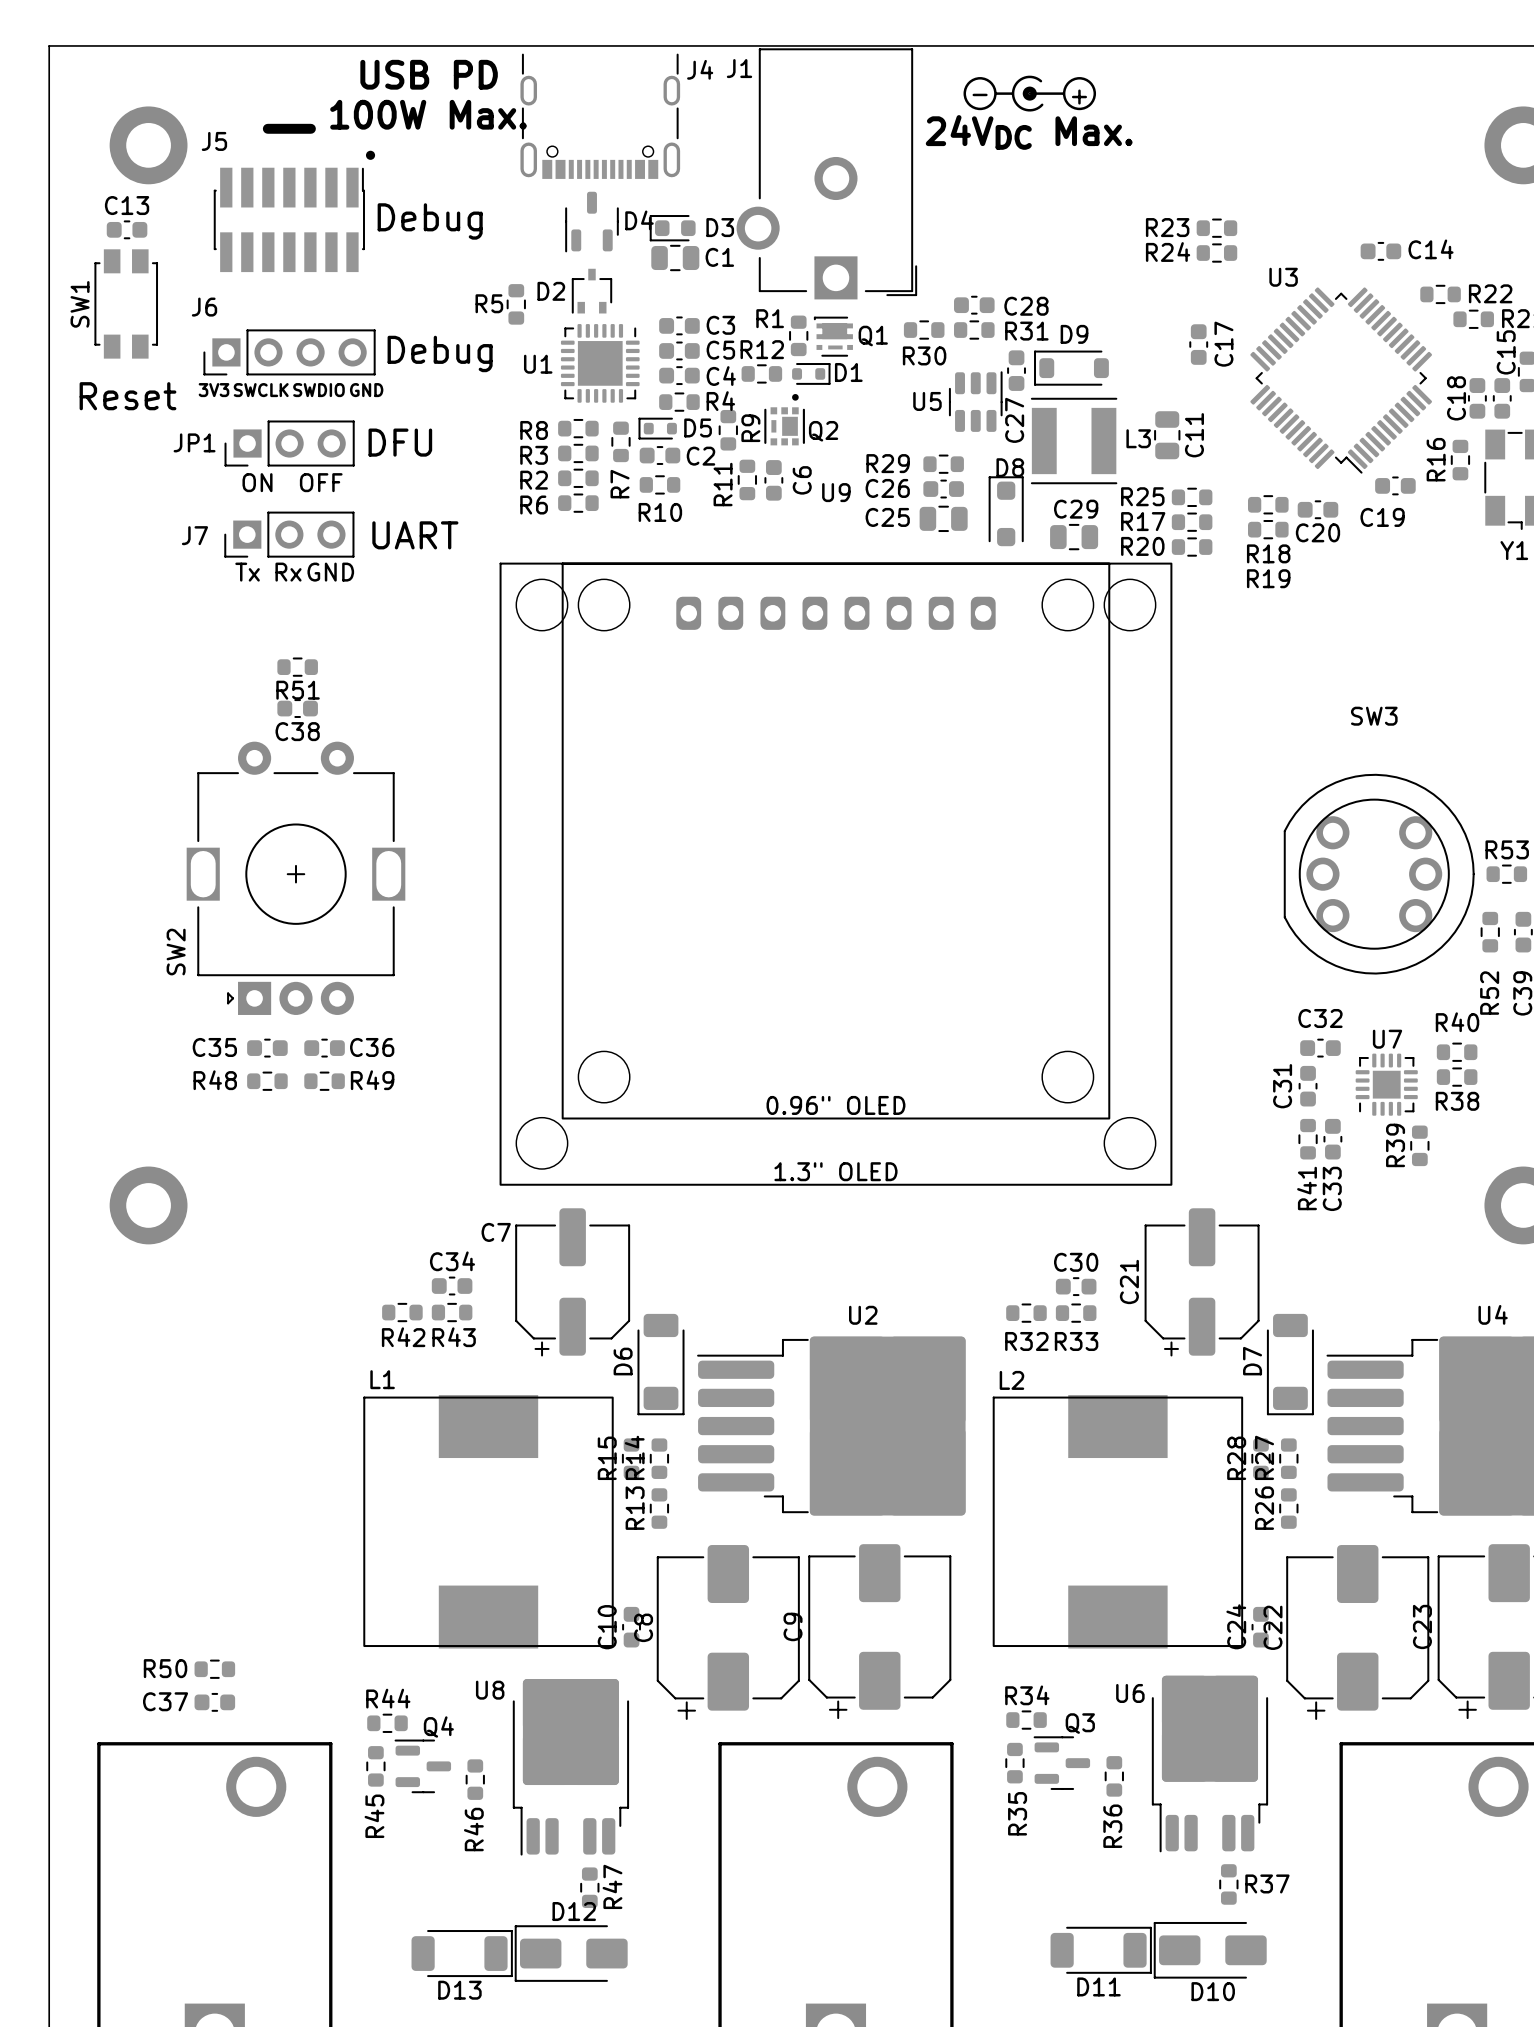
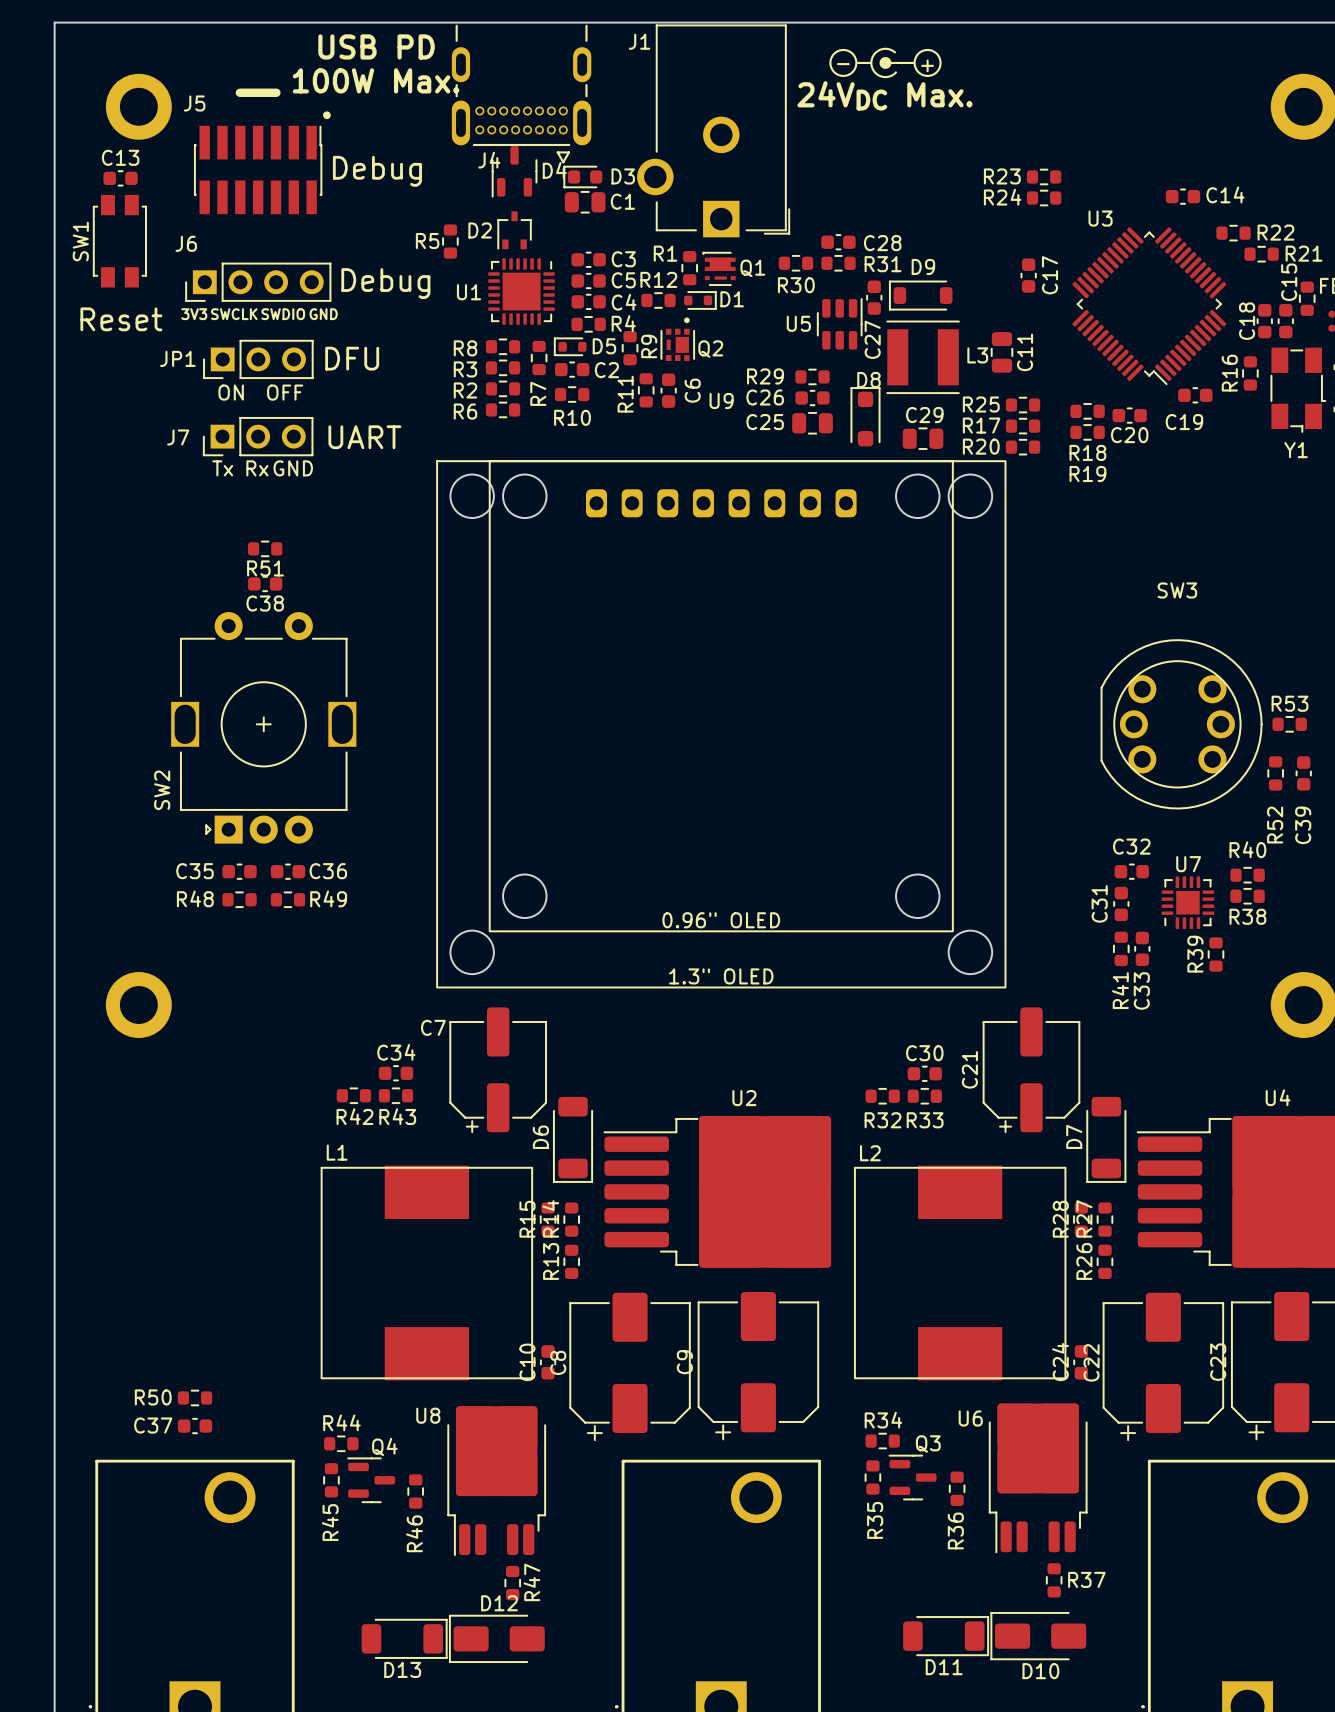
J4 footprint: [520, 53, 681, 179] -> [451, 24, 592, 164]
J4 name position: J4 (700, 69) -> J4 (489, 160)

